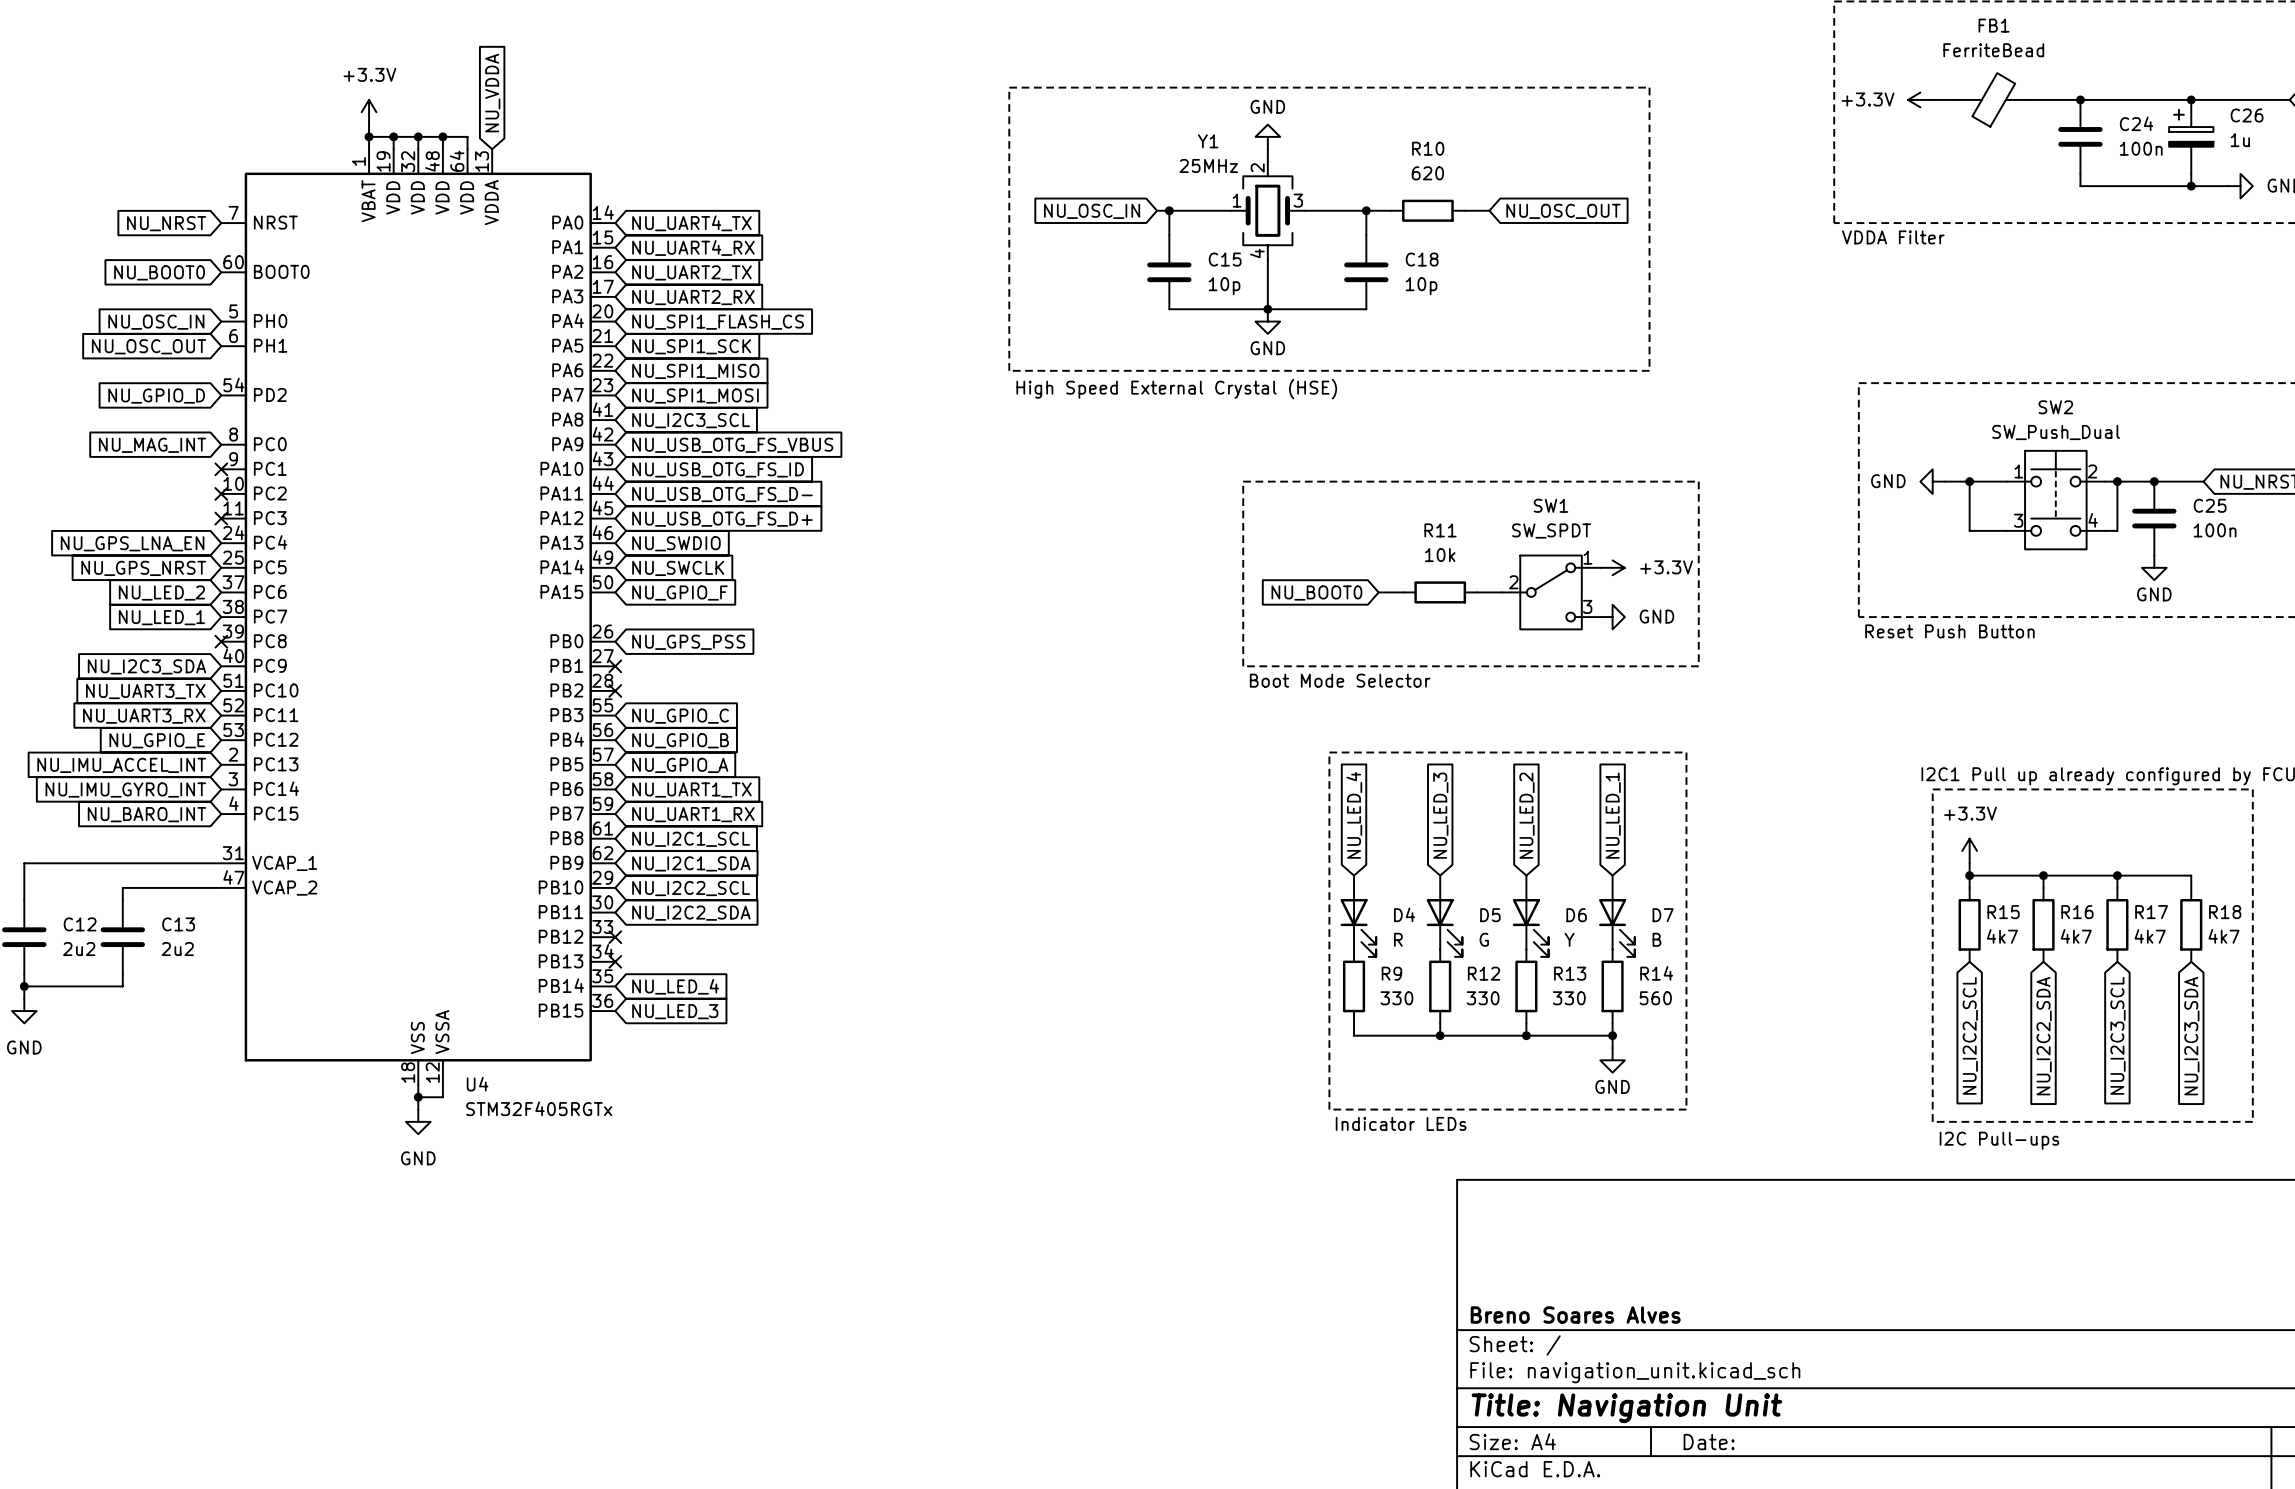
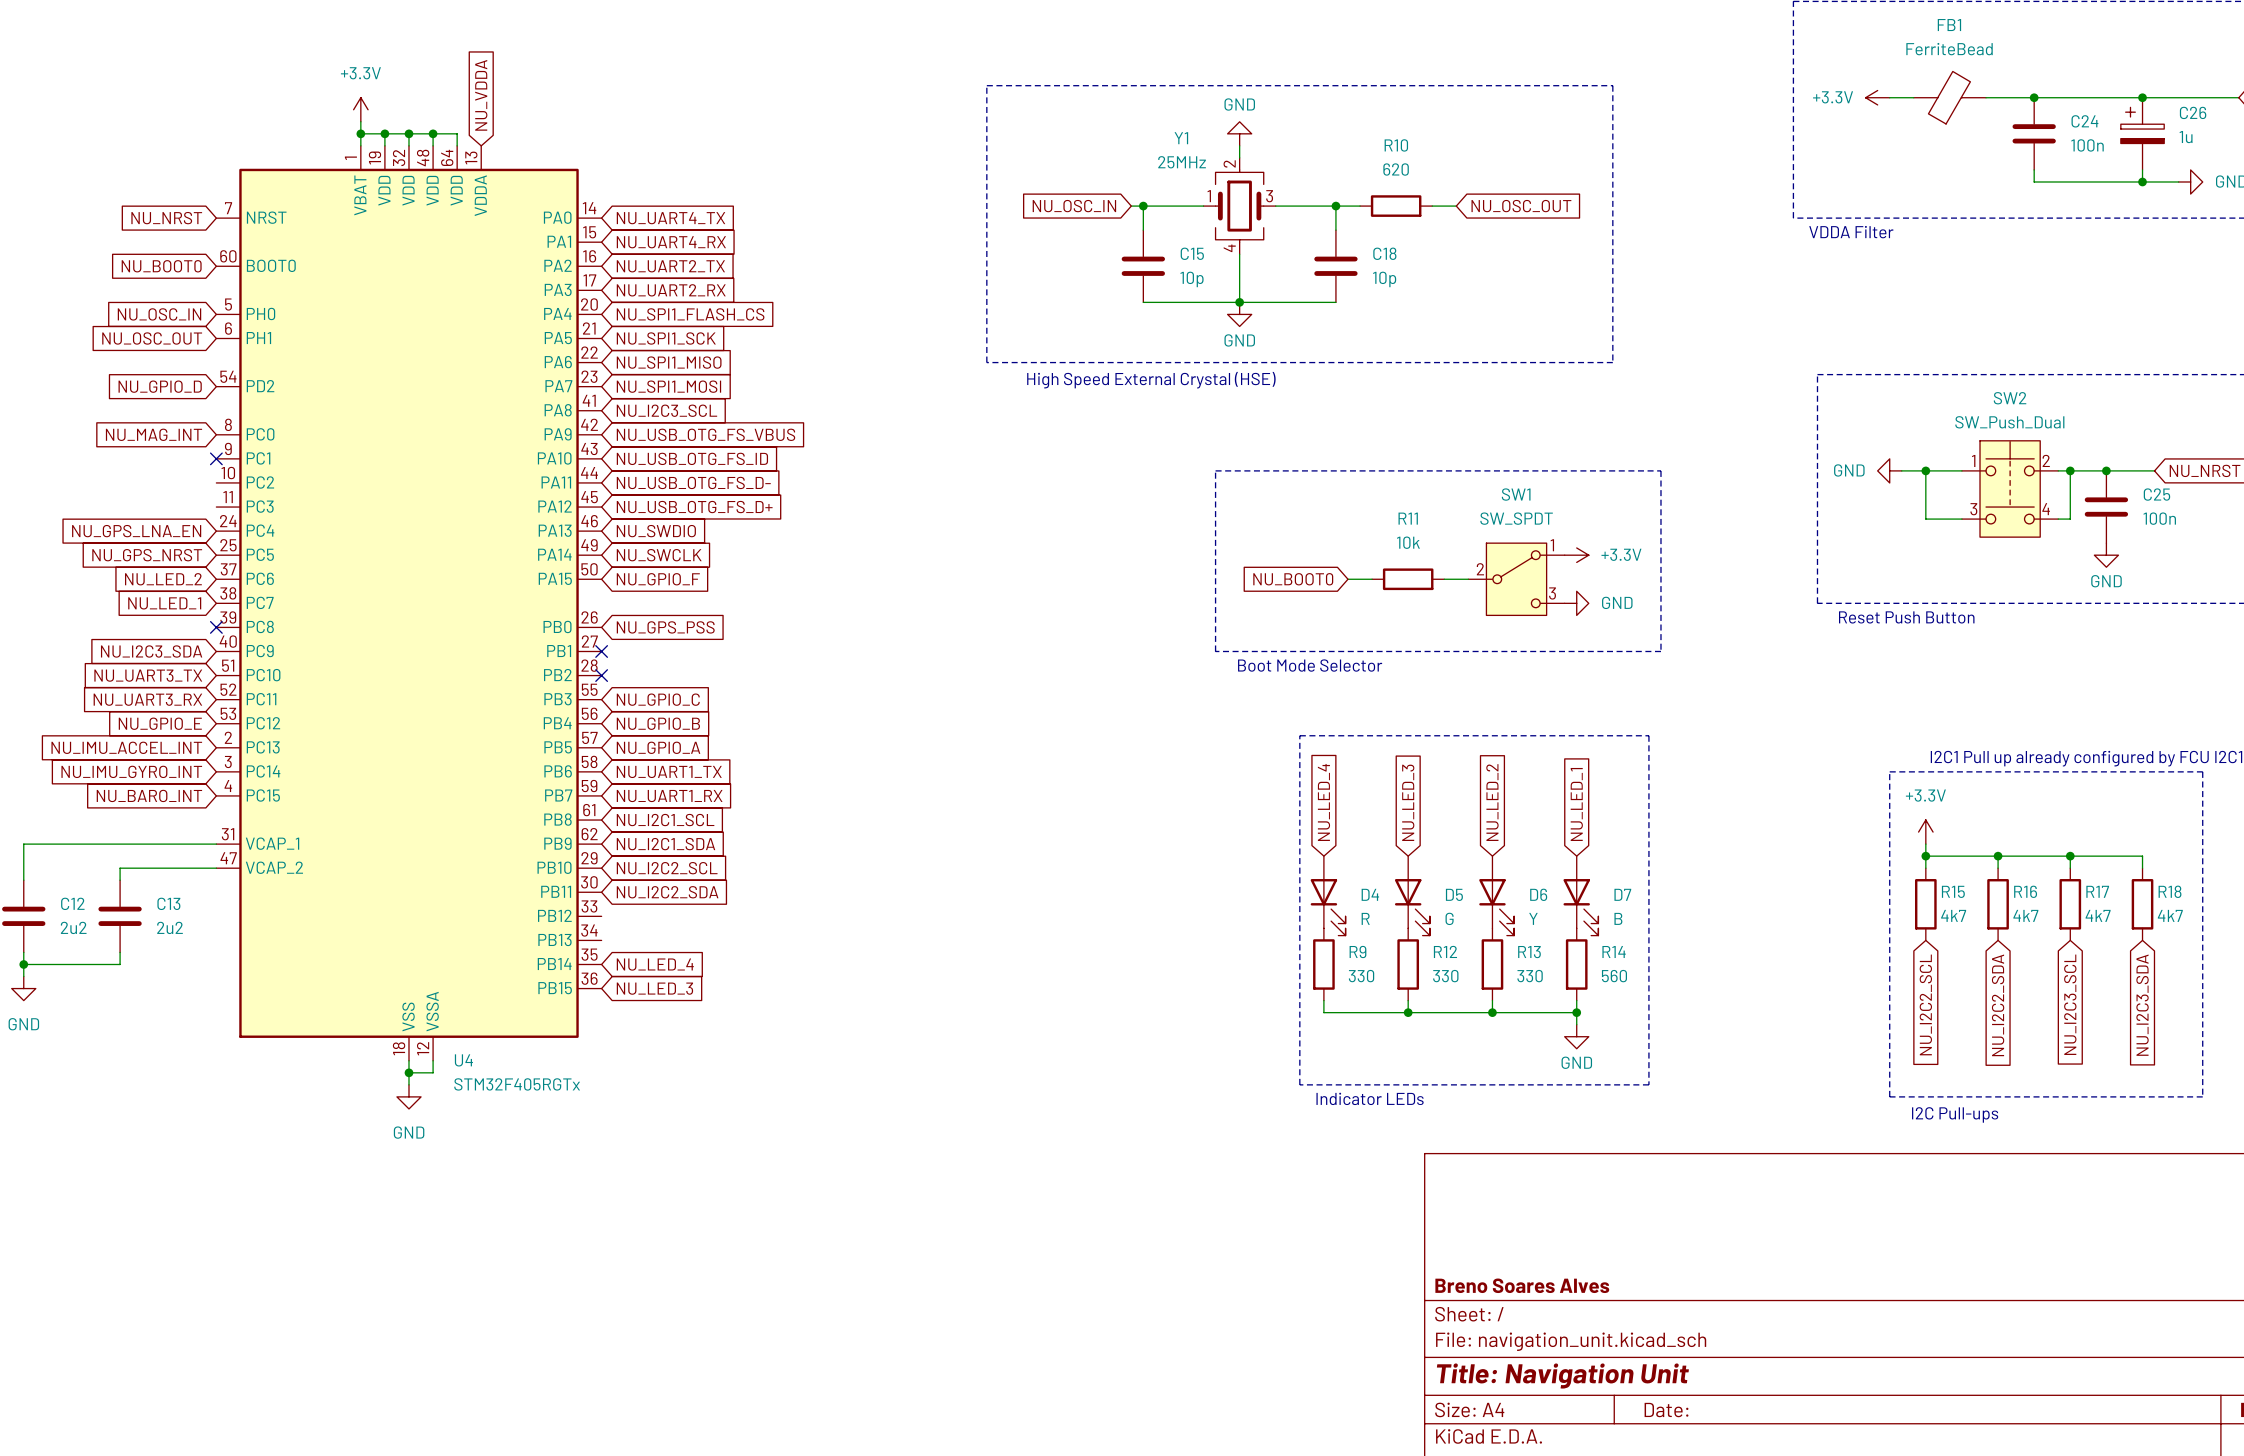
no-connect mark: (221, 493) -> none
no-connect mark: (221, 518) -> none
no-connect mark: (615, 937) -> none
no-connect mark: (615, 961) -> none

